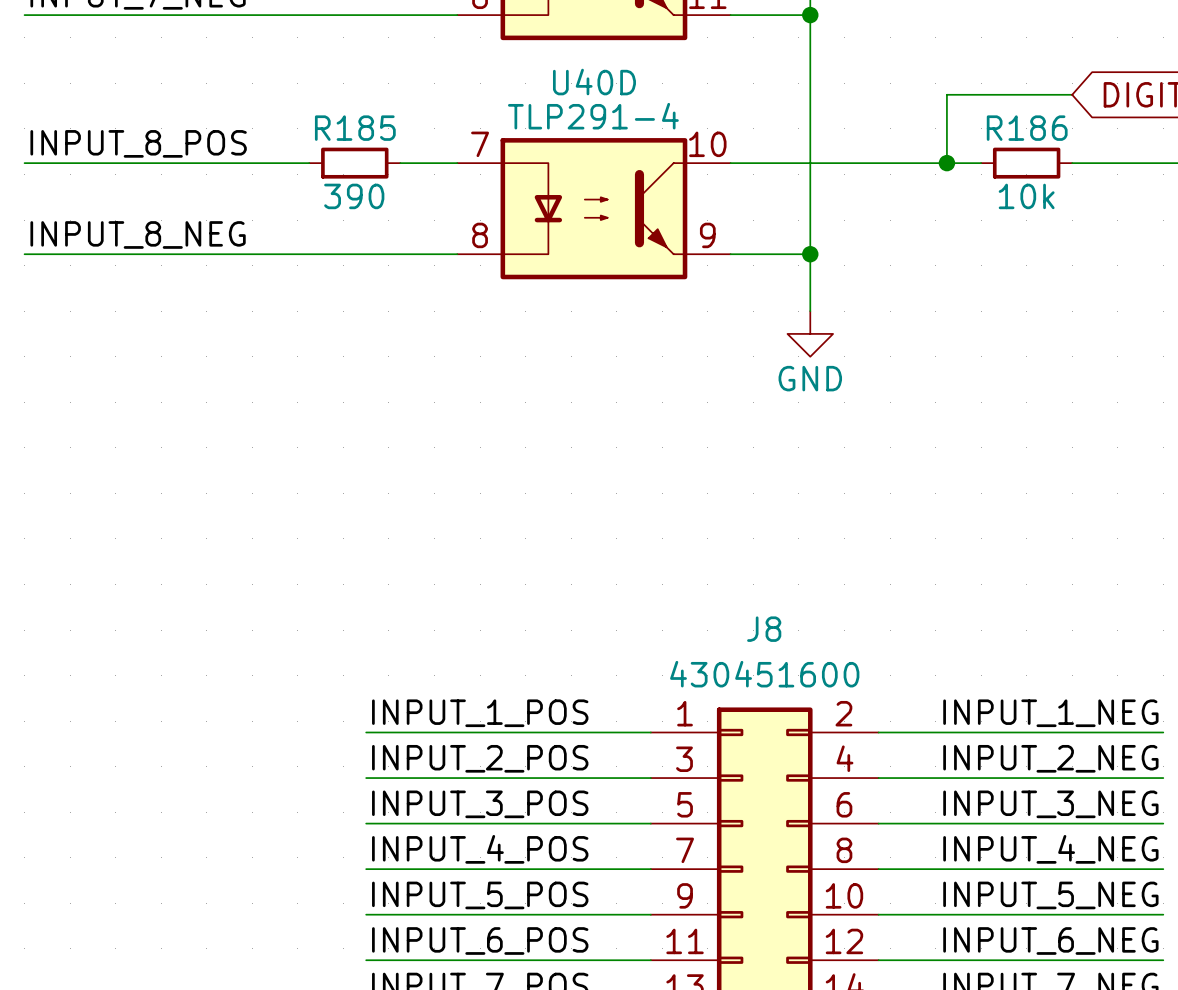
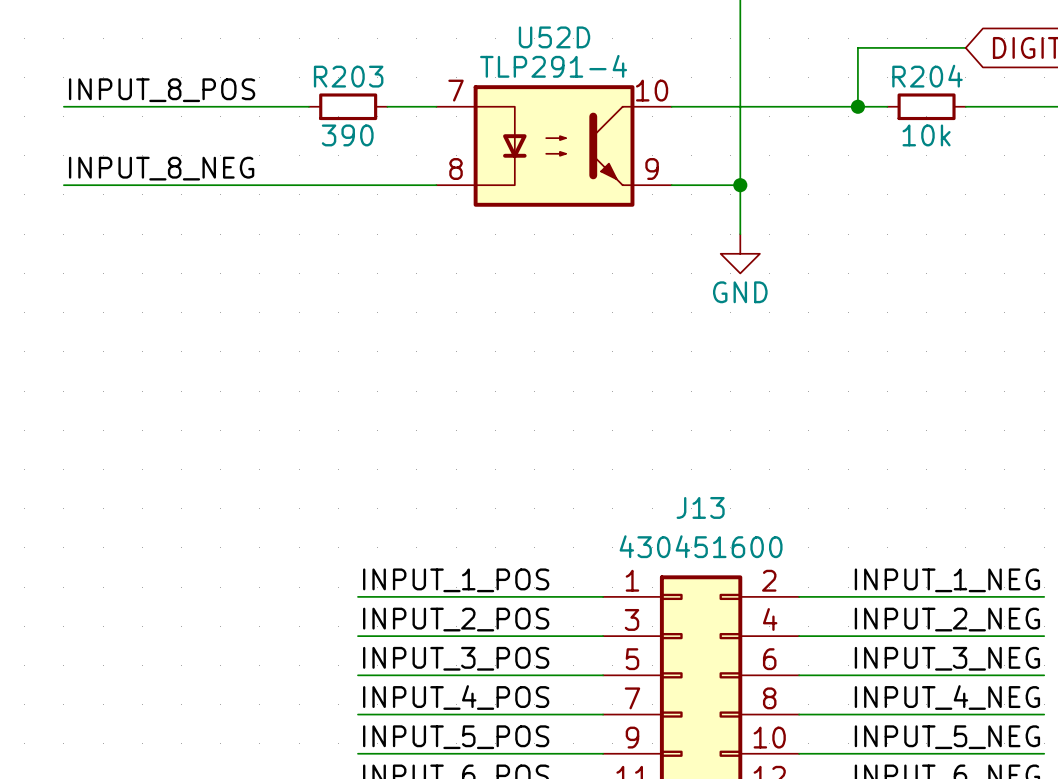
U40D name: U40D (594, 82) -> U52D (554, 37)
R185 name: R185 (355, 128) -> R203 (348, 76)
R186 name: R186 (1027, 128) -> R204 (927, 76)
J8 name: J8 (764, 629) -> J13 (700, 507)

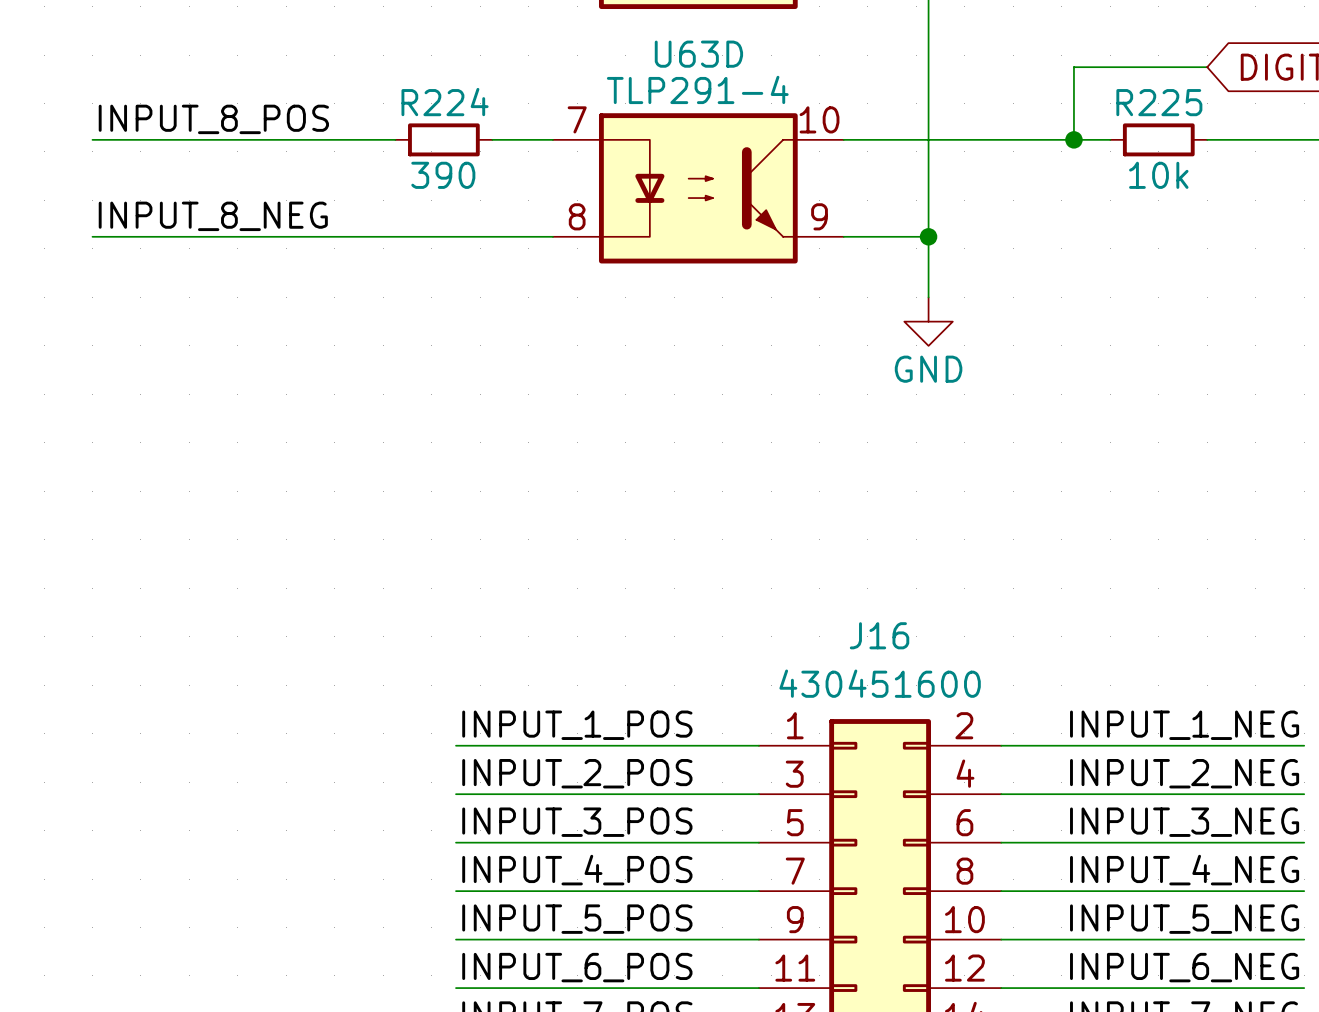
U52D name: U52D (554, 37) -> U63D (698, 54)
R203 name: R203 (348, 76) -> R224 (445, 102)
R204 name: R204 (927, 76) -> R225 (1159, 102)
J13 name: J13 (700, 507) -> J16 (879, 635)

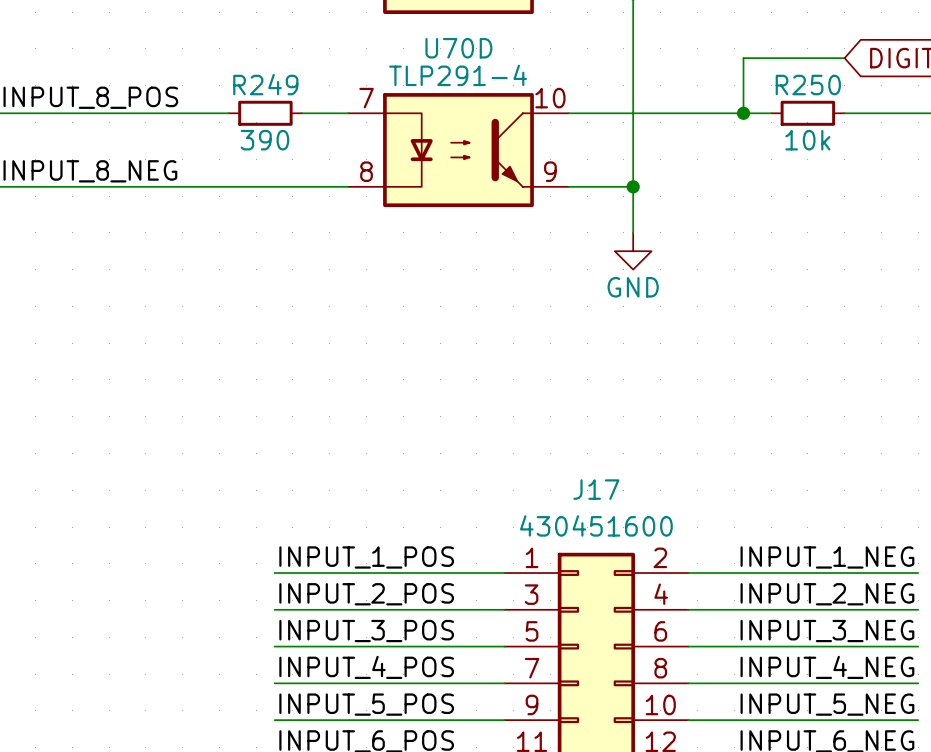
U63D name: U63D (698, 54) -> U70D (458, 48)
R224 name: R224 (445, 102) -> R249 (265, 84)
R225 name: R225 (1159, 102) -> R250 (808, 85)
J16 name: J16 (879, 635) -> J17 (596, 489)

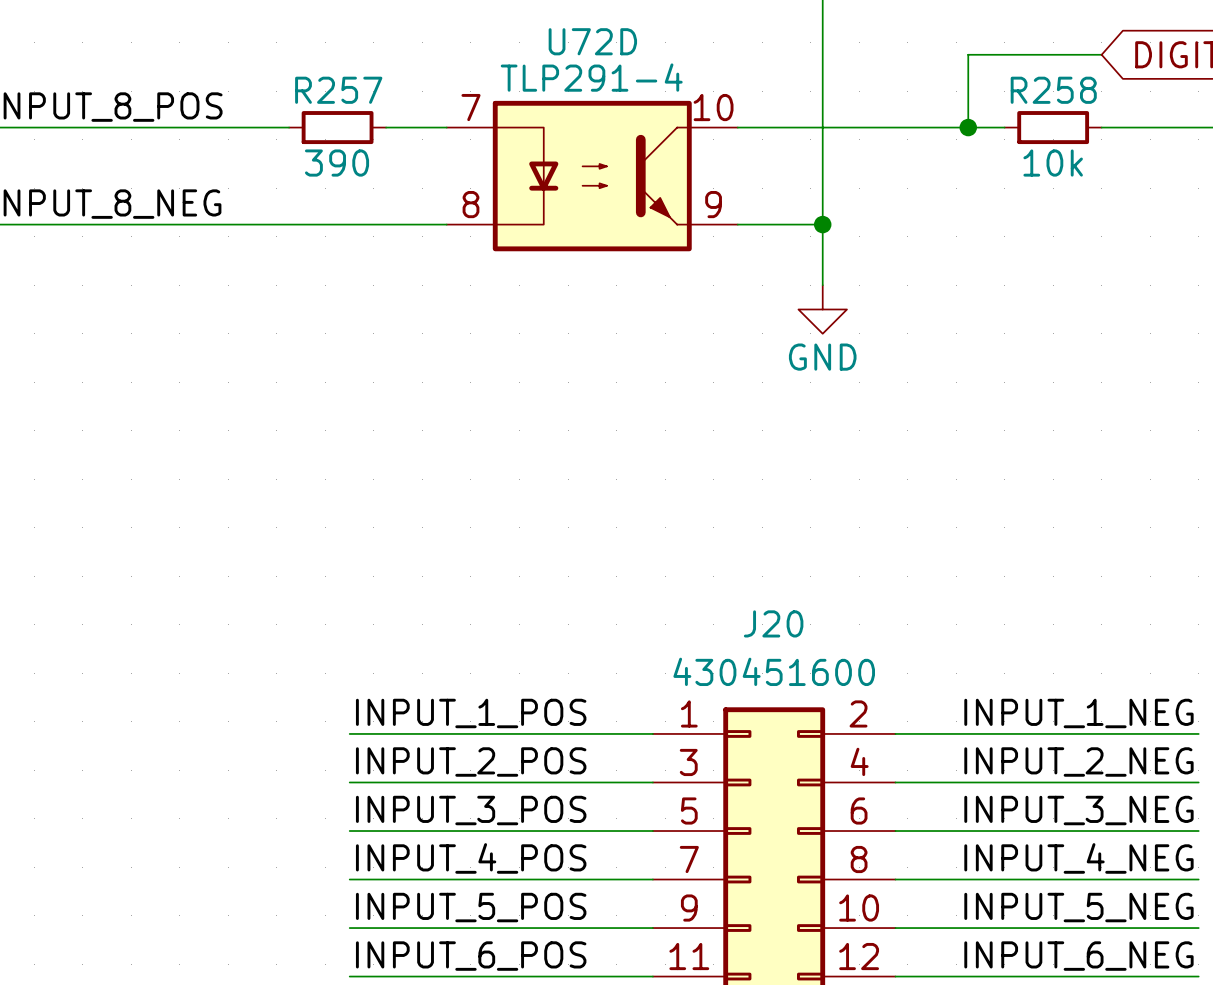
U70D name: U70D (458, 48) -> U72D (592, 41)
R249 name: R249 (265, 84) -> R257 (338, 90)
R250 name: R250 (808, 85) -> R258 (1053, 90)
J17 name: J17 (596, 489) -> J20 (773, 623)

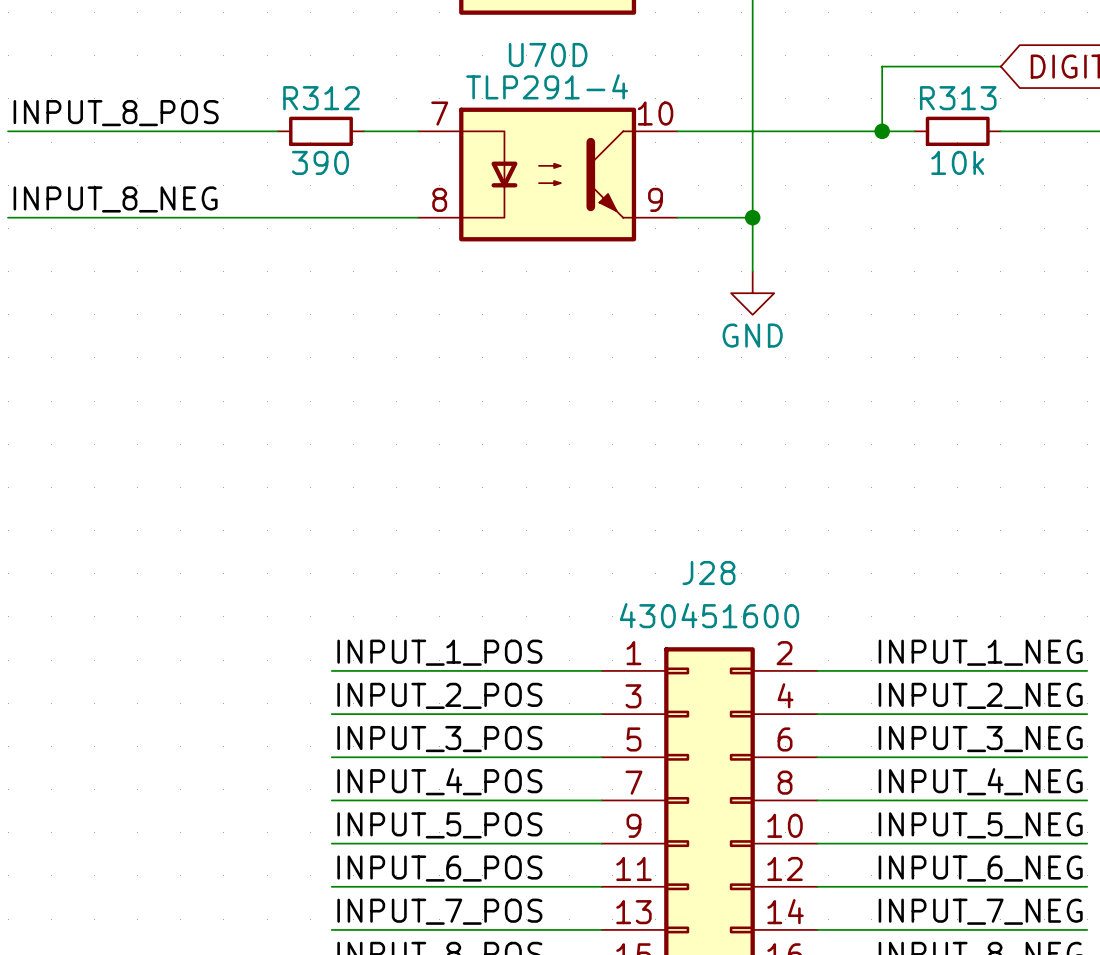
U72D name: U72D (592, 41) -> U70D (548, 54)
R257 name: R257 (338, 90) -> R312 (321, 98)
R258 name: R258 (1053, 90) -> R313 (958, 98)
J20 name: J20 (773, 623) -> J28 (708, 573)

